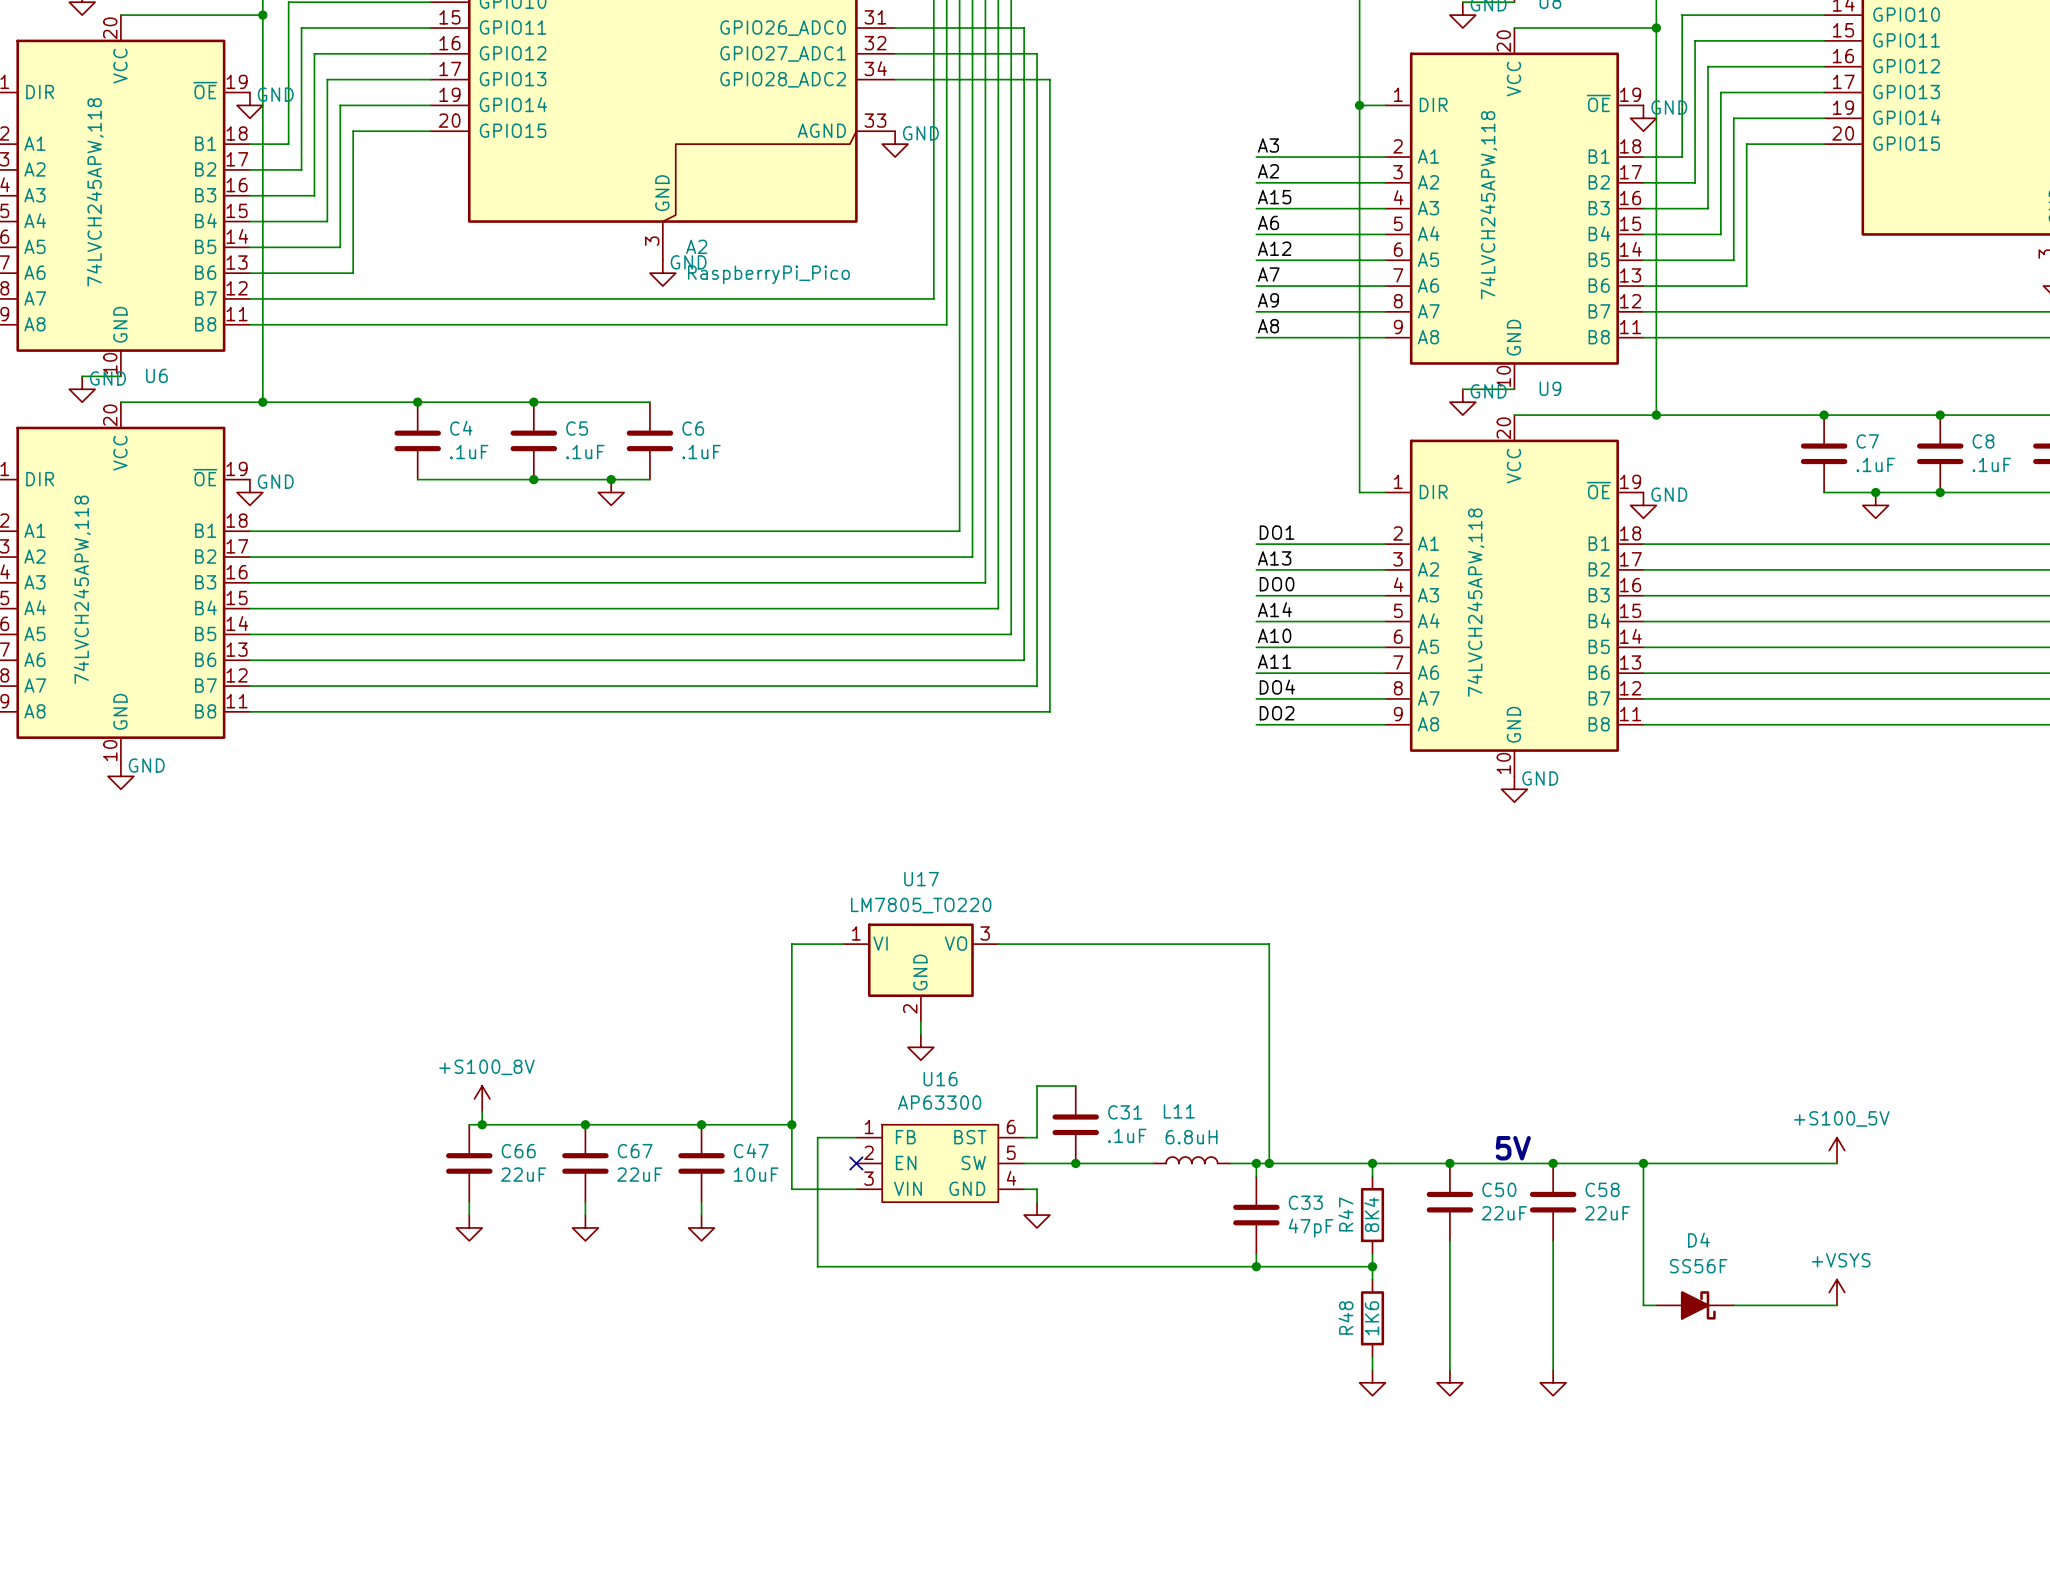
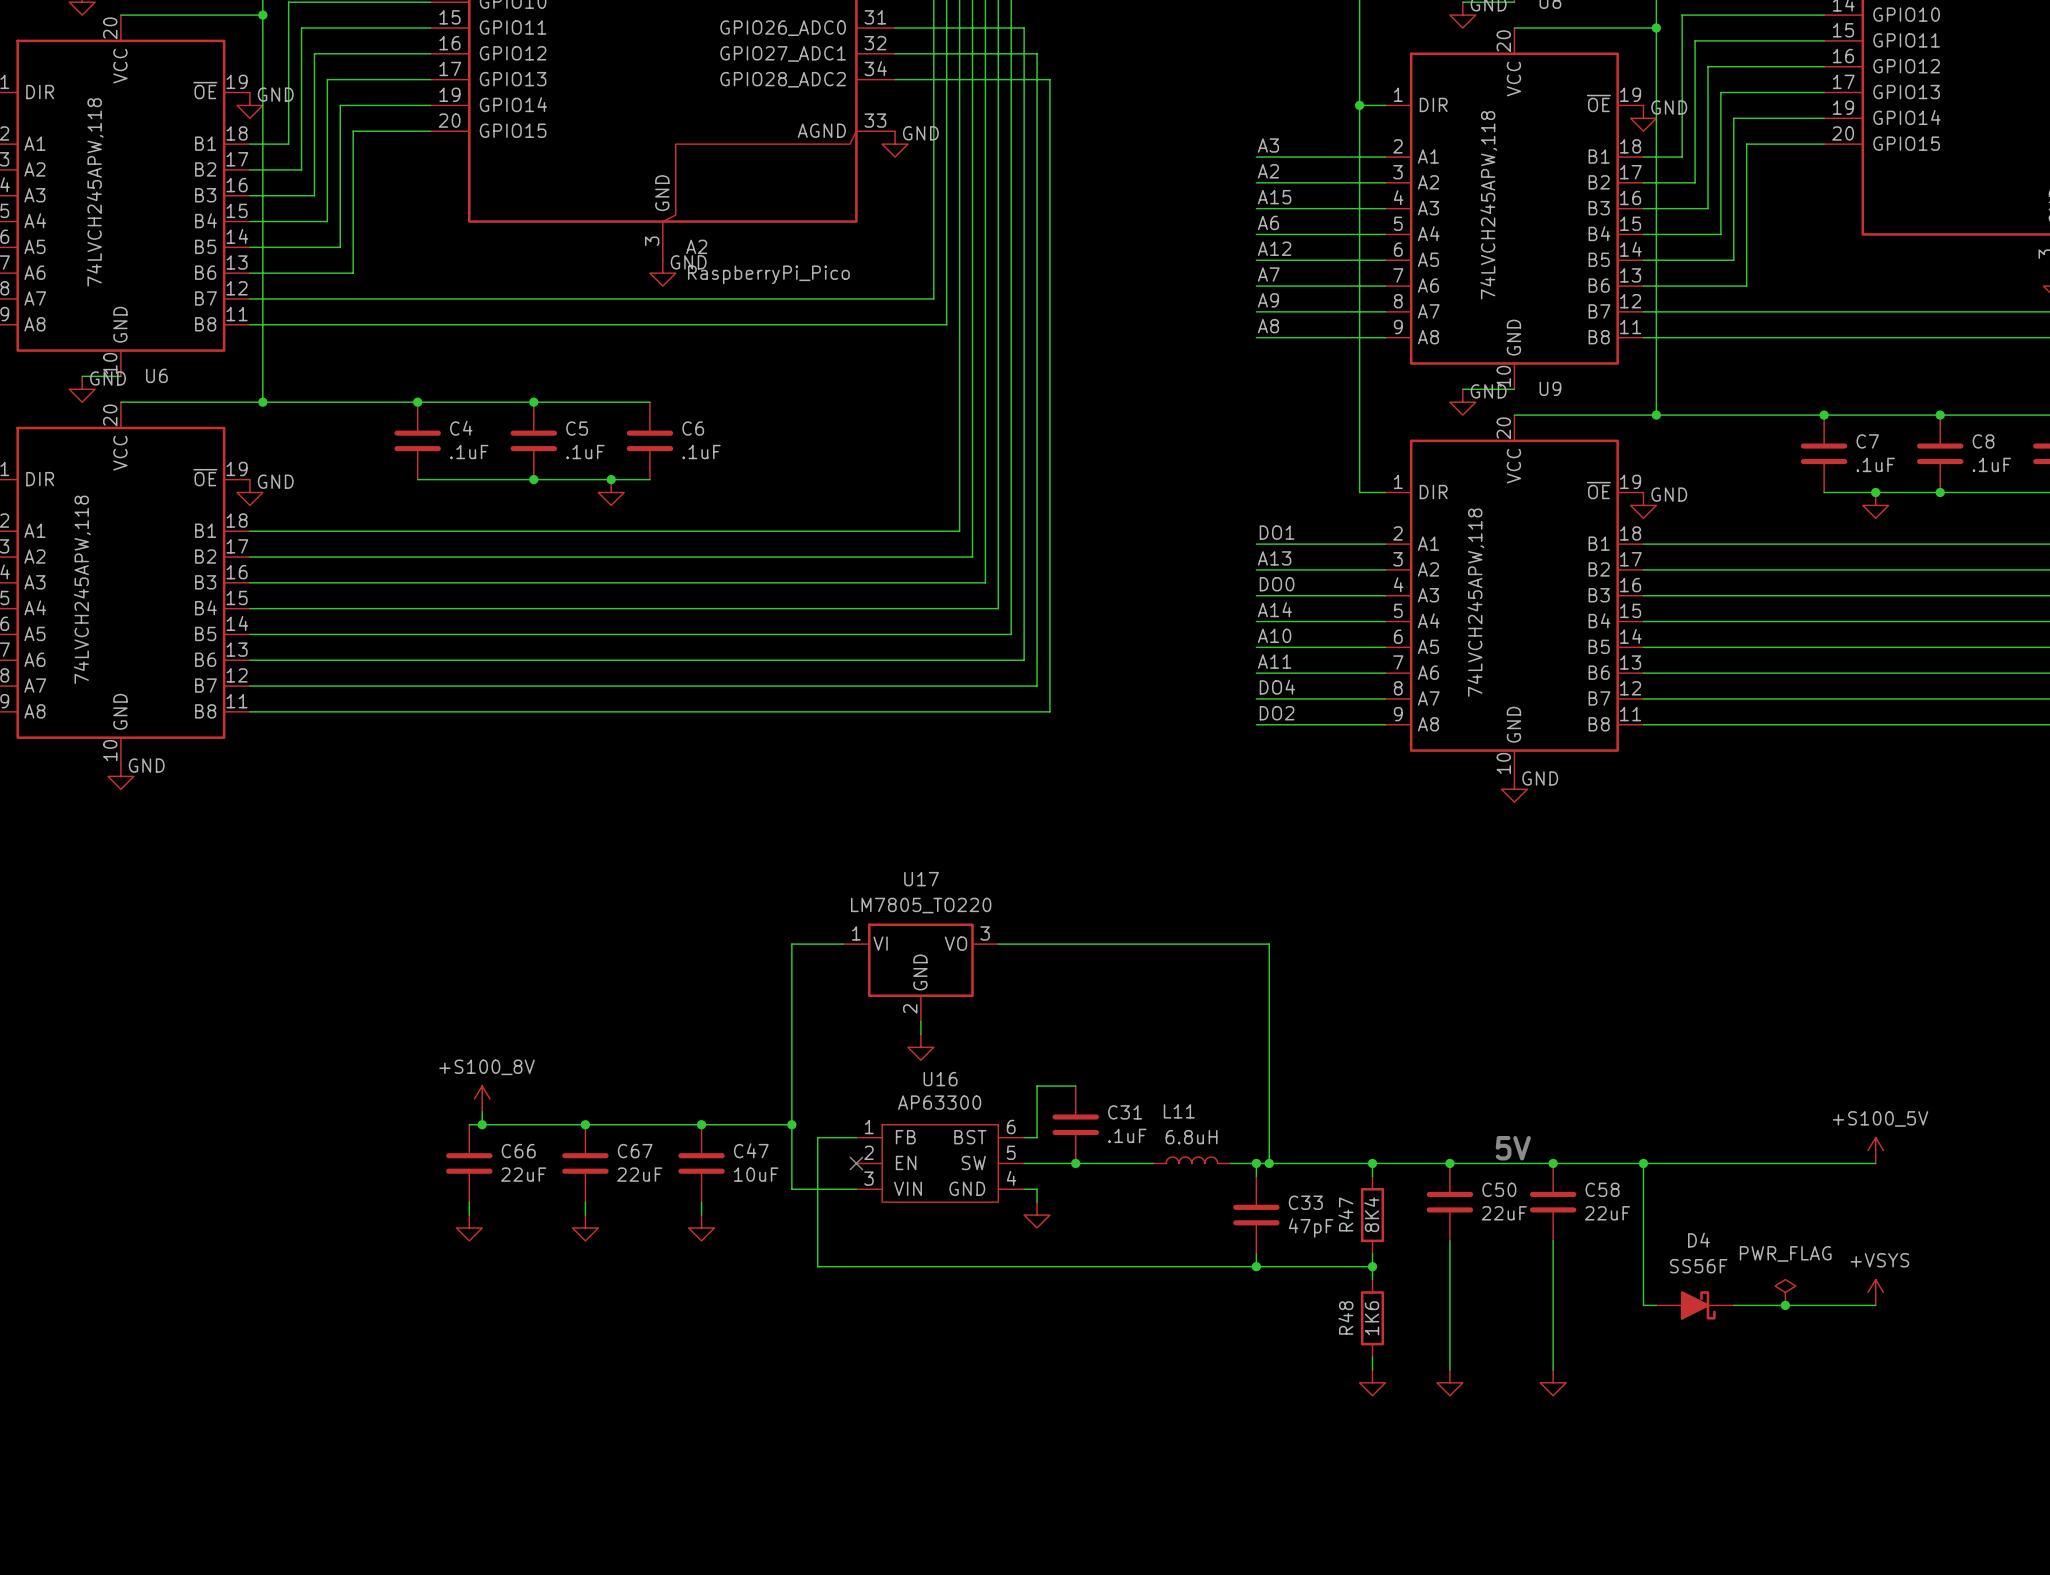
power symbol position: +S100_5V (1837, 1150) -> +S100_5V (1875, 1150)
wire: none -> (1837, 1163) (1875, 1163)
power symbol: none -> PWR_FLAG (1785, 1292)
power symbol position: +VSYS (1837, 1292) -> +VSYS (1875, 1292)
junction: none -> (1785, 1305)
wire: none -> (1837, 1305) (1875, 1305)

